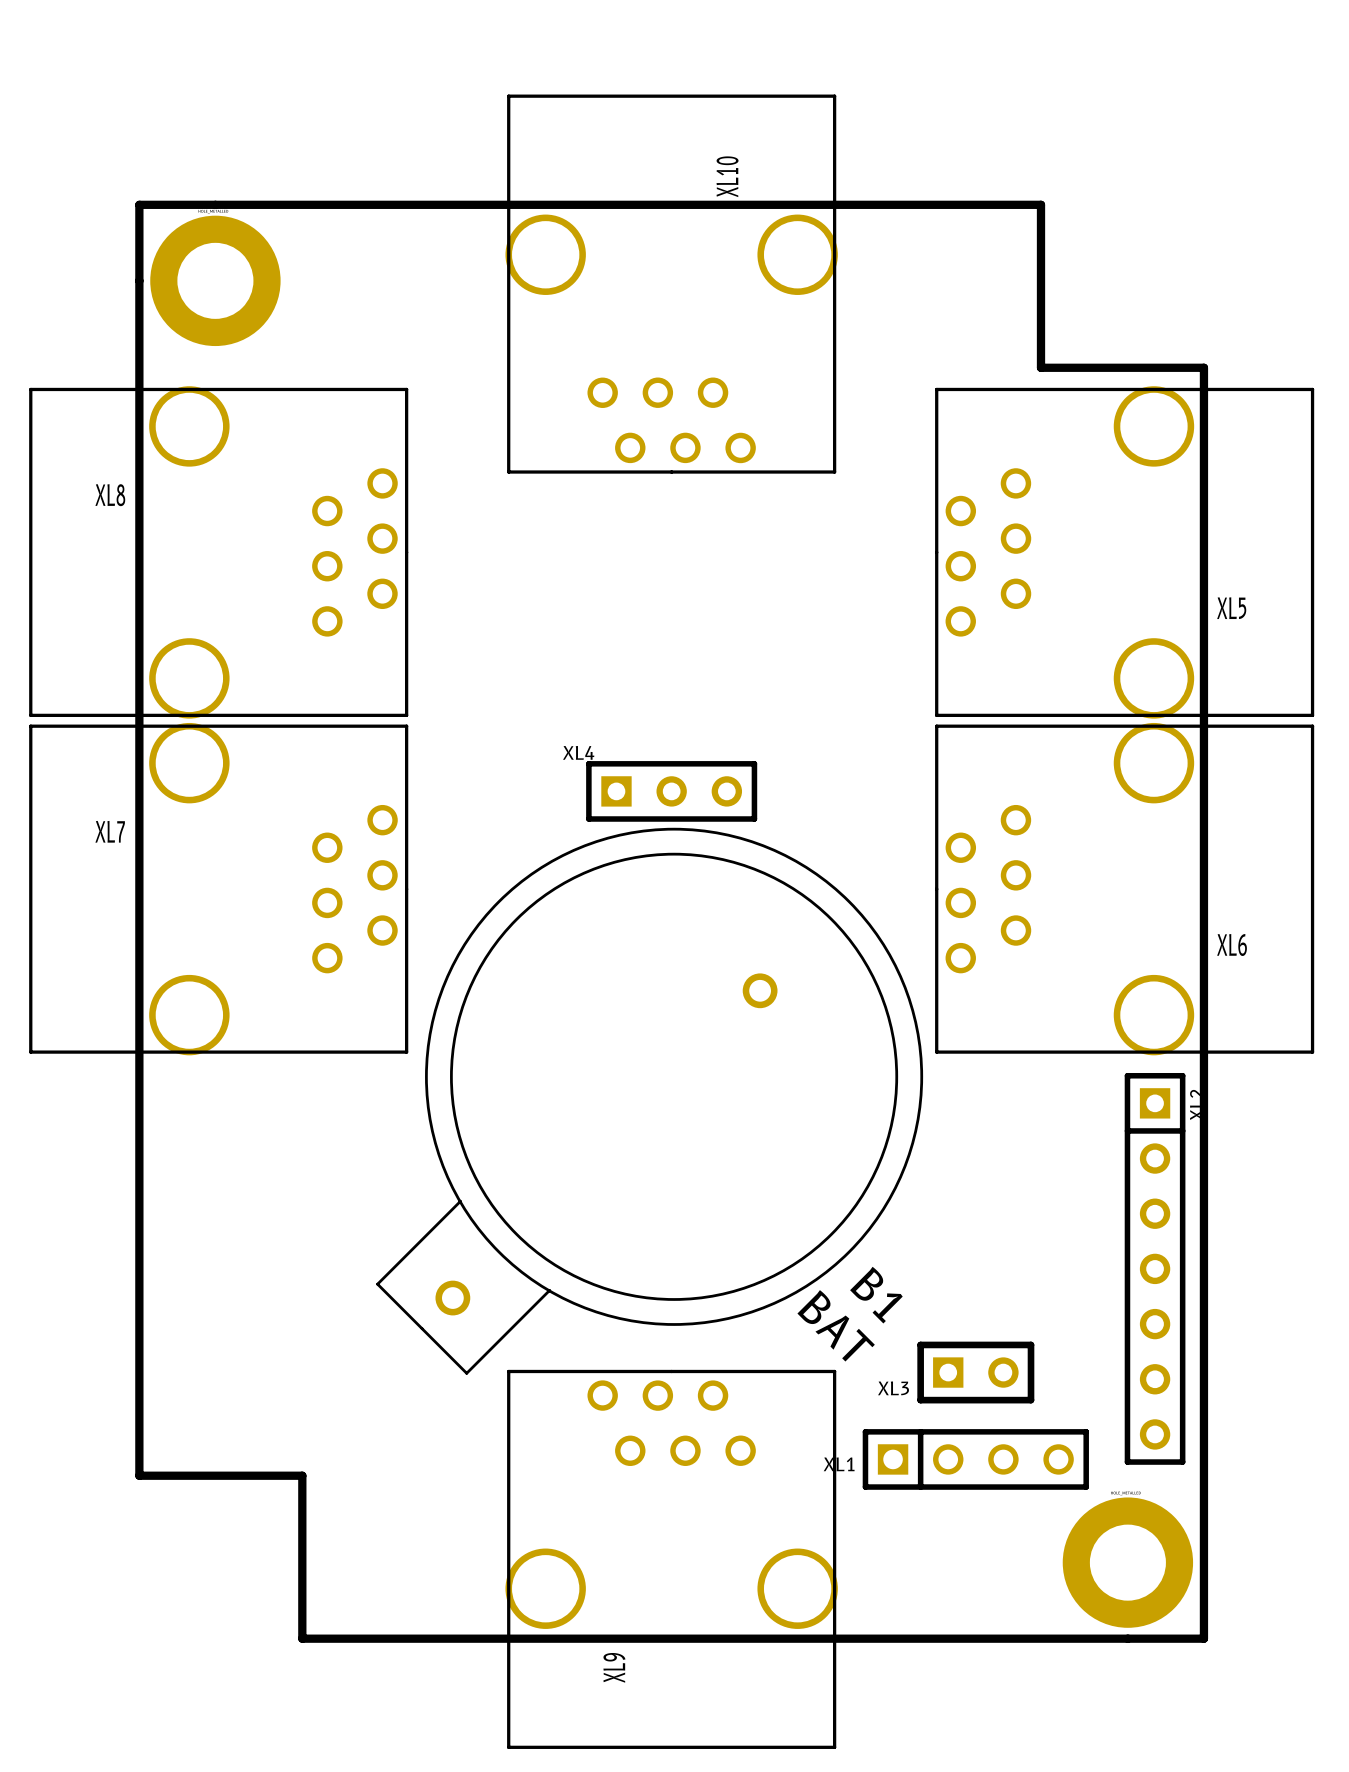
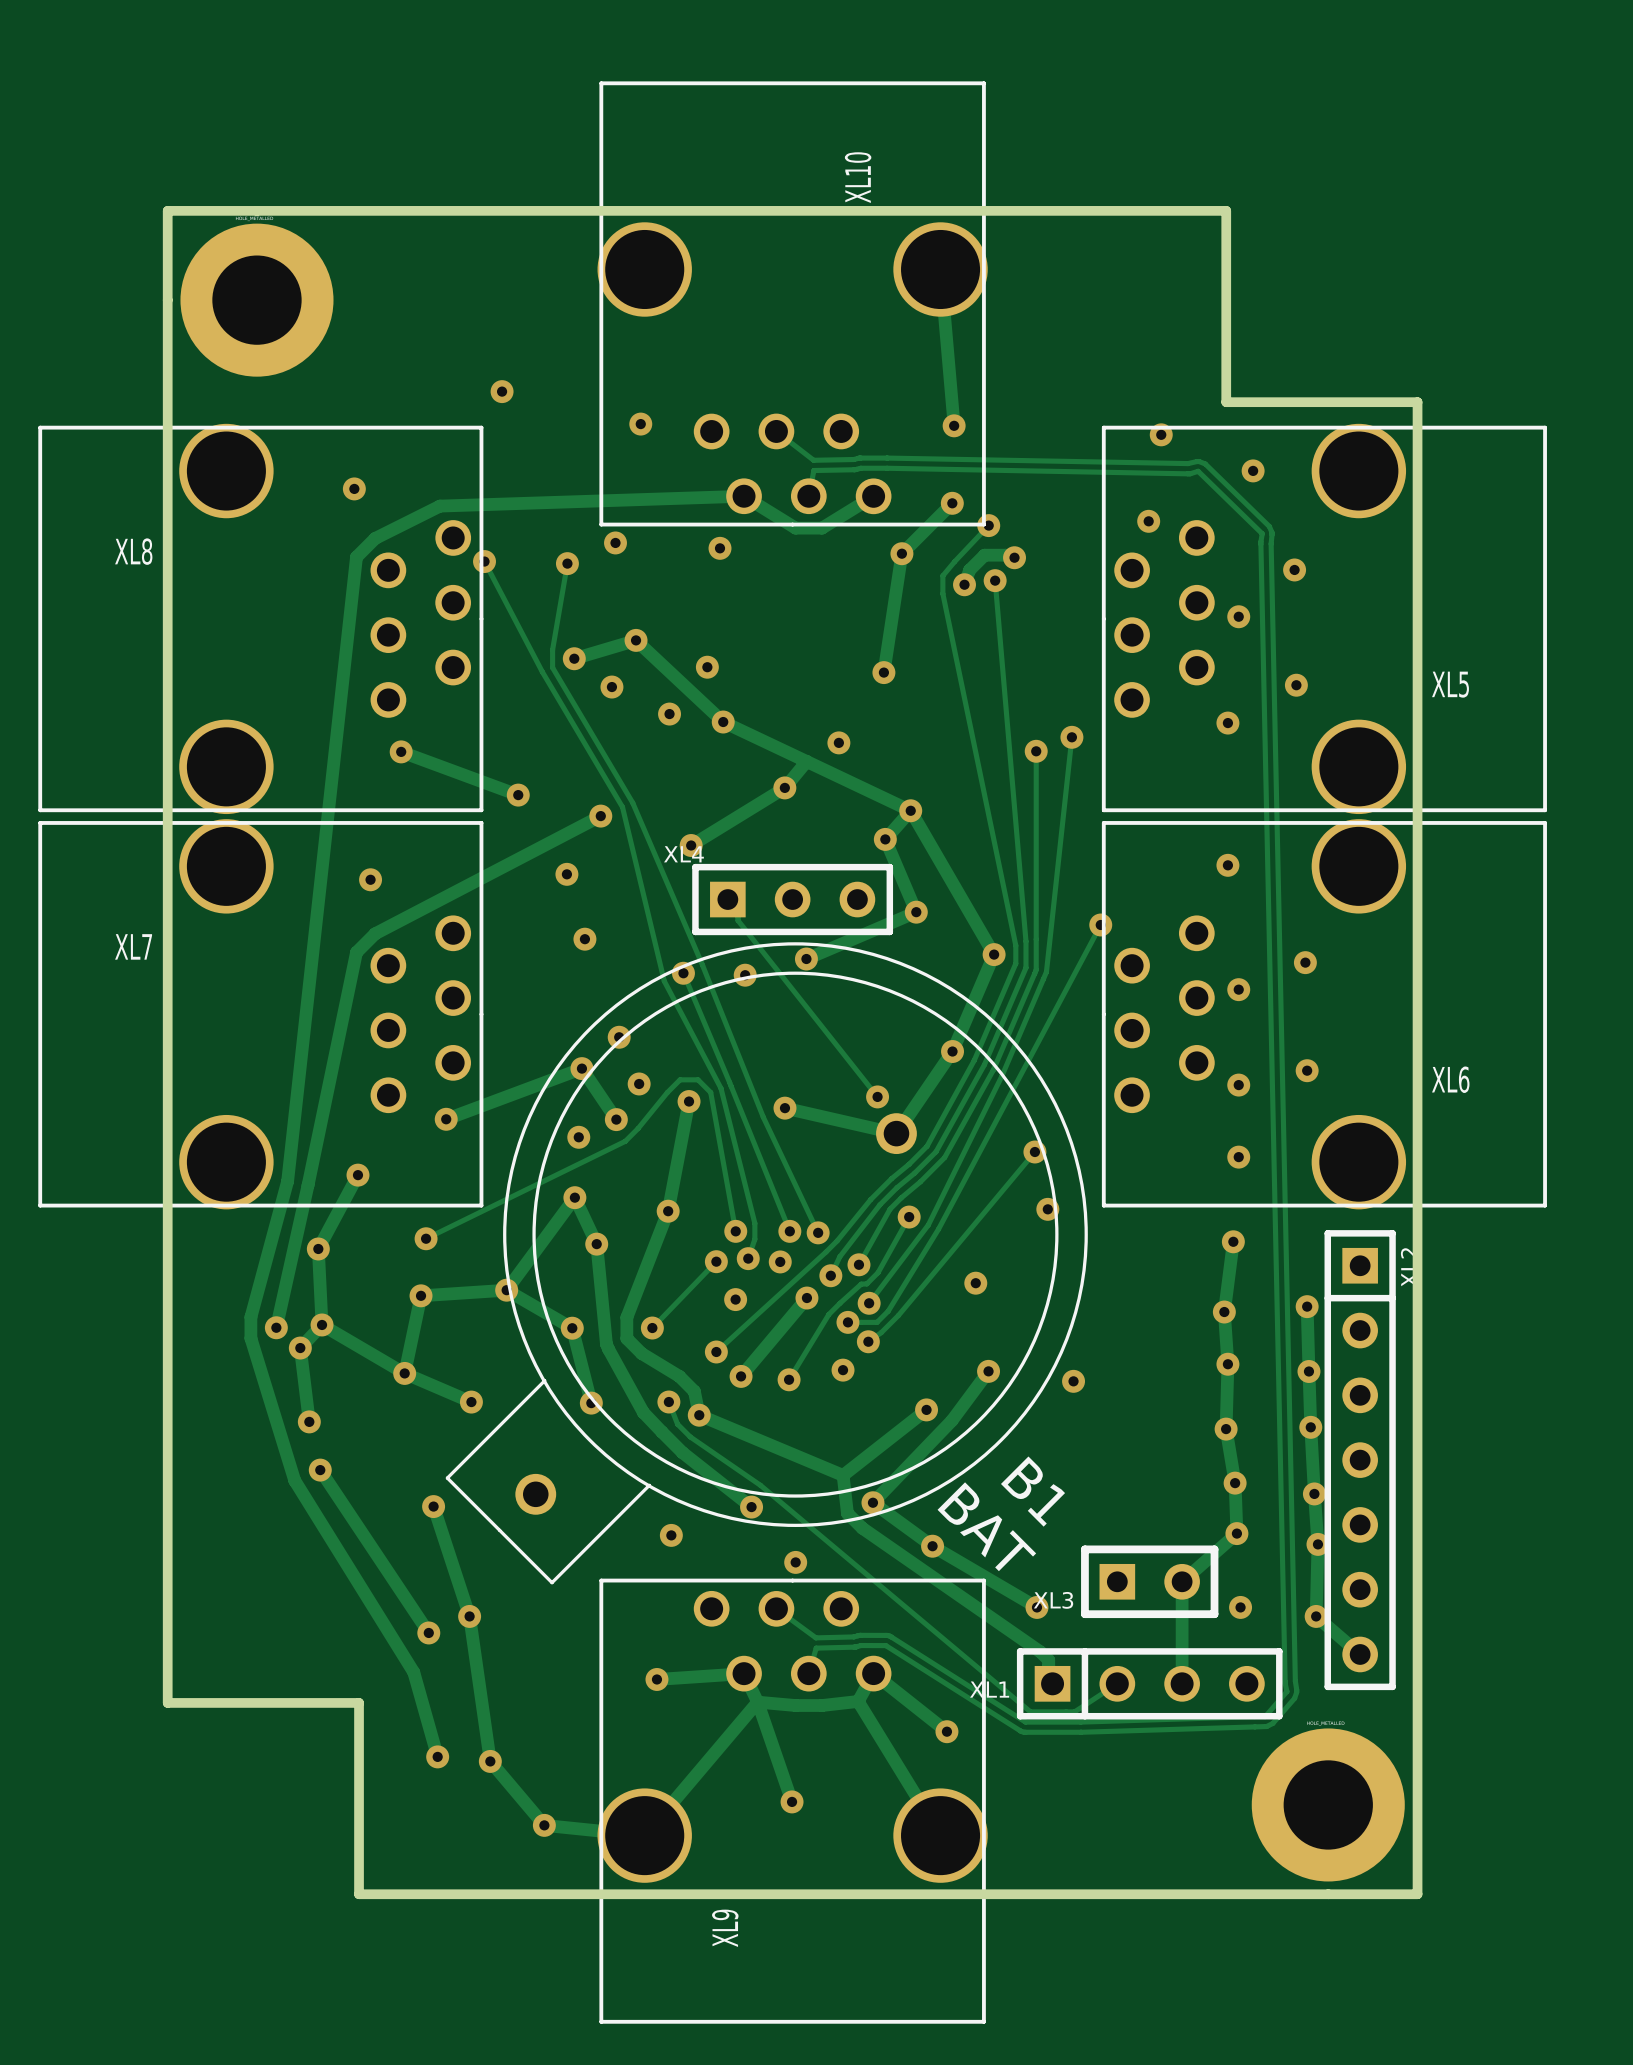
track: none -> (940, 269) (954, 425)
via: none -> (502, 391)
via: none -> (640, 424)
via: none -> (954, 425)
track: none -> (776, 431) (813, 460) (887, 458) (1188, 463) (1199, 461) (1205, 463) (1269, 526) (1272, 532) (1296, 1690) (1294, 1698) (1272, 1723) (1266, 1726) (1024, 1732) (885, 1645) (816, 1648) (808, 1673)
via: none -> (1161, 434)
via: none -> (1253, 470)
via: none -> (354, 488)
track: none -> (808, 496) (813, 470) (887, 468) (1187, 473) (1198, 471) (1262, 533) (1260, 544) (1285, 1683) (1286, 1691) (1265, 1716) (1025, 1722) (890, 1636) (860, 1635) (815, 1637) (776, 1608)
track: none -> (873, 496) (822, 528) (795, 528) (744, 496) (440, 506) (375, 538) (356, 557) (287, 1181) (250, 1317) (250, 1338) (294, 1480) (413, 1672) (437, 1756)
track: none -> (952, 503) (901, 553) (883, 672)
via: none -> (952, 503)
via: none -> (1148, 521)
track: none -> (988, 525) (942, 575) (942, 593) (1015, 945) (1015, 963) (974, 1060) (927, 1146) (870, 1199) (826, 1252) (716, 1351)
via: none -> (988, 525)
via: none -> (615, 542)
via: none -> (720, 548)
via: none -> (901, 553)
track: none -> (1014, 557) (1005, 555) (984, 555) (969, 570) (964, 584)
via: none -> (1014, 557)
track: none -> (484, 561) (542, 671) (622, 807) (664, 981) (720, 1088) (754, 1223) (754, 1239) (748, 1258)
via: none -> (484, 561)
track: none -> (567, 563) (552, 649) (552, 667) (632, 802) (702, 965) (763, 1117) (818, 1232)
via: none -> (567, 563)
via: none -> (1294, 569)
track: none -> (995, 580) (1025, 941) (1025, 967) (984, 1064) (936, 1151) (879, 1204) (839, 1256) (830, 1275)
via: none -> (995, 580)
via: none -> (964, 584)
via: none -> (1238, 616)
via: none -> (636, 640)
track: none -> (574, 658) (636, 640) (723, 722) (806, 761)
via: none -> (574, 658)
via: none -> (707, 667)
via: none -> (883, 672)
via: none -> (1296, 685)
via: none -> (611, 687)
via: none -> (669, 714)
via: none -> (723, 722)
via: none -> (1227, 723)
track: none -> (1071, 737) (1046, 971) (1001, 1076) (928, 1225) (869, 1303)
via: none -> (1071, 737)
via: none -> (838, 742)
track: none -> (401, 751) (518, 795)
via: none -> (401, 751)
track: none -> (1036, 751) (1036, 969) (993, 1070) (944, 1157) (890, 1209) (858, 1264)
via: none -> (1036, 751)
track: none -> (806, 761) (784, 787) (691, 845)
track: none -> (806, 761) (910, 810)
via: none -> (784, 787)
via: none -> (518, 795)
track: none -> (910, 810) (885, 839) (916, 912) (806, 959)
track: none -> (910, 810) (994, 954) (952, 1051) (896, 1133) (784, 1108)
via: none -> (910, 810)
track: none -> (600, 816) (375, 933) (356, 952) (276, 1327)
via: none -> (600, 816)
via: none -> (885, 839)
via: none -> (691, 845)
via: none -> (1227, 865)
via: none -> (566, 874)
via: none -> (370, 879)
track: none -> (727, 899) (738, 914) (738, 920) (877, 1096)
via: none -> (916, 912)
track: none -> (1100, 924) (938, 1229) (888, 1311) (877, 1322) (847, 1322)
via: none -> (1100, 924)
via: none -> (584, 939)
via: none -> (994, 954)
via: none -> (806, 959)
via: none -> (1305, 962)
track: none -> (683, 973) (789, 1231)
via: none -> (683, 973)
via: none -> (745, 975)
via: none -> (1238, 989)
via: none -> (619, 1037)
via: none -> (952, 1051)
via: none -> (581, 1068)
via: none -> (1307, 1070)
via: none -> (639, 1083)
via: none -> (1238, 1085)
via: none -> (877, 1096)
track: none -> (689, 1101) (668, 1211) (626, 1317) (626, 1338) (641, 1353) (679, 1376) (694, 1391) (699, 1415) (843, 1475)
via: none -> (689, 1101)
via: none -> (784, 1108)
track: none -> (446, 1119) (581, 1068) (616, 1119)
via: none -> (446, 1119)
via: none -> (616, 1119)
via: none -> (578, 1137)
track: none -> (1034, 1152) (898, 1315) (881, 1332) (868, 1341)
via: none -> (1034, 1152)
via: none -> (1238, 1157)
track: none -> (357, 1175) (318, 1248) (322, 1324)
via: none -> (357, 1175)
via: none -> (574, 1197)
via: none -> (1047, 1209)
via: none -> (668, 1211)
track: none -> (909, 1217) (878, 1272) (866, 1283) (861, 1284) (828, 1314) (789, 1379)
via: none -> (909, 1217)
track: none -> (735, 1231) (710, 1092) (698, 1079) (680, 1079) (625, 1141) (426, 1238)
via: none -> (735, 1231)
via: none -> (789, 1231)
via: none -> (818, 1232)
via: none -> (426, 1238)
track: none -> (1233, 1241) (1224, 1312) (1227, 1364) (1226, 1429) (1235, 1483) (1236, 1533) (1182, 1581) (1182, 1683)
via: none -> (1233, 1241)
via: none -> (596, 1244)
via: none -> (318, 1248)
via: none -> (748, 1258)
track: none -> (716, 1261) (652, 1328)
via: none -> (716, 1261)
via: none -> (780, 1261)
via: none -> (858, 1264)
via: none -> (830, 1275)
via: none -> (975, 1283)
track: none -> (506, 1290) (572, 1328) (591, 1403)
track: none -> (506, 1290) (574, 1197) (596, 1244) (606, 1344) (643, 1412) (682, 1452) (751, 1507)
track: none -> (506, 1290) (421, 1295) (404, 1373)
via: none -> (506, 1290)
via: none -> (421, 1295)
track: none -> (806, 1298) (741, 1376)
via: none -> (806, 1298)
via: none -> (735, 1299)
via: none -> (869, 1303)
track: none -> (1307, 1306) (1310, 1427) (1317, 1544) (1316, 1616) (1360, 1654)
via: none -> (1307, 1306)
via: none -> (1224, 1312)
via: none -> (847, 1322)
track: none -> (322, 1324) (300, 1348) (309, 1421)
track: none -> (322, 1324) (404, 1373)
via: none -> (322, 1324)
via: none -> (276, 1327)
via: none -> (572, 1328)
via: none -> (652, 1328)
via: none -> (868, 1341)
via: none -> (300, 1348)
via: none -> (716, 1351)
via: none -> (1227, 1364)
via: none -> (843, 1370)
track: none -> (988, 1371) (952, 1420) (872, 1502) (932, 1546) (1037, 1607)
via: none -> (988, 1371)
via: none -> (1308, 1371)
track: none -> (404, 1373) (471, 1402)
via: none -> (404, 1373)
via: none -> (741, 1376)
via: none -> (789, 1379)
via: none -> (1073, 1381)
via: none -> (471, 1402)
track: none -> (668, 1402) (677, 1424) (690, 1436) (760, 1485) (1030, 1711) (1074, 1711) (1117, 1683)
via: none -> (668, 1402)
via: none -> (591, 1403)
track: none -> (926, 1409) (843, 1475)
via: none -> (926, 1409)
via: none -> (699, 1415)
via: none -> (309, 1421)
via: none -> (1310, 1427)
via: none -> (1226, 1429)
track: none -> (320, 1470) (428, 1632)
via: none -> (320, 1470)
track: none -> (843, 1475) (847, 1513) (862, 1528) (1040, 1651) (1048, 1660) (1048, 1672) (1052, 1683)
via: none -> (1235, 1483)
via: none -> (1314, 1493)
via: none -> (872, 1502)
track: none -> (433, 1506) (469, 1616) (490, 1761) (544, 1825) (644, 1835) (757, 1702)
via: none -> (433, 1506)
via: none -> (751, 1507)
via: none -> (1236, 1533)
via: none -> (671, 1535)
via: none -> (1317, 1544)
via: none -> (932, 1546)
via: none -> (795, 1562)
via: none -> (1037, 1607)
via: none -> (1240, 1607)
via: none -> (469, 1616)
via: none -> (1316, 1616)
via: none -> (428, 1632)
track: none -> (656, 1679) (744, 1673) (757, 1702)
via: none -> (656, 1679)
track: none -> (858, 1701) (940, 1835)
track: none -> (858, 1701) (822, 1705) (757, 1702)
track: none -> (858, 1701) (873, 1673) (946, 1731)
track: none -> (757, 1702) (792, 1801)
via: none -> (946, 1731)
via: none -> (437, 1756)
via: none -> (490, 1761)
via: none -> (792, 1801)
via: none -> (544, 1825)

